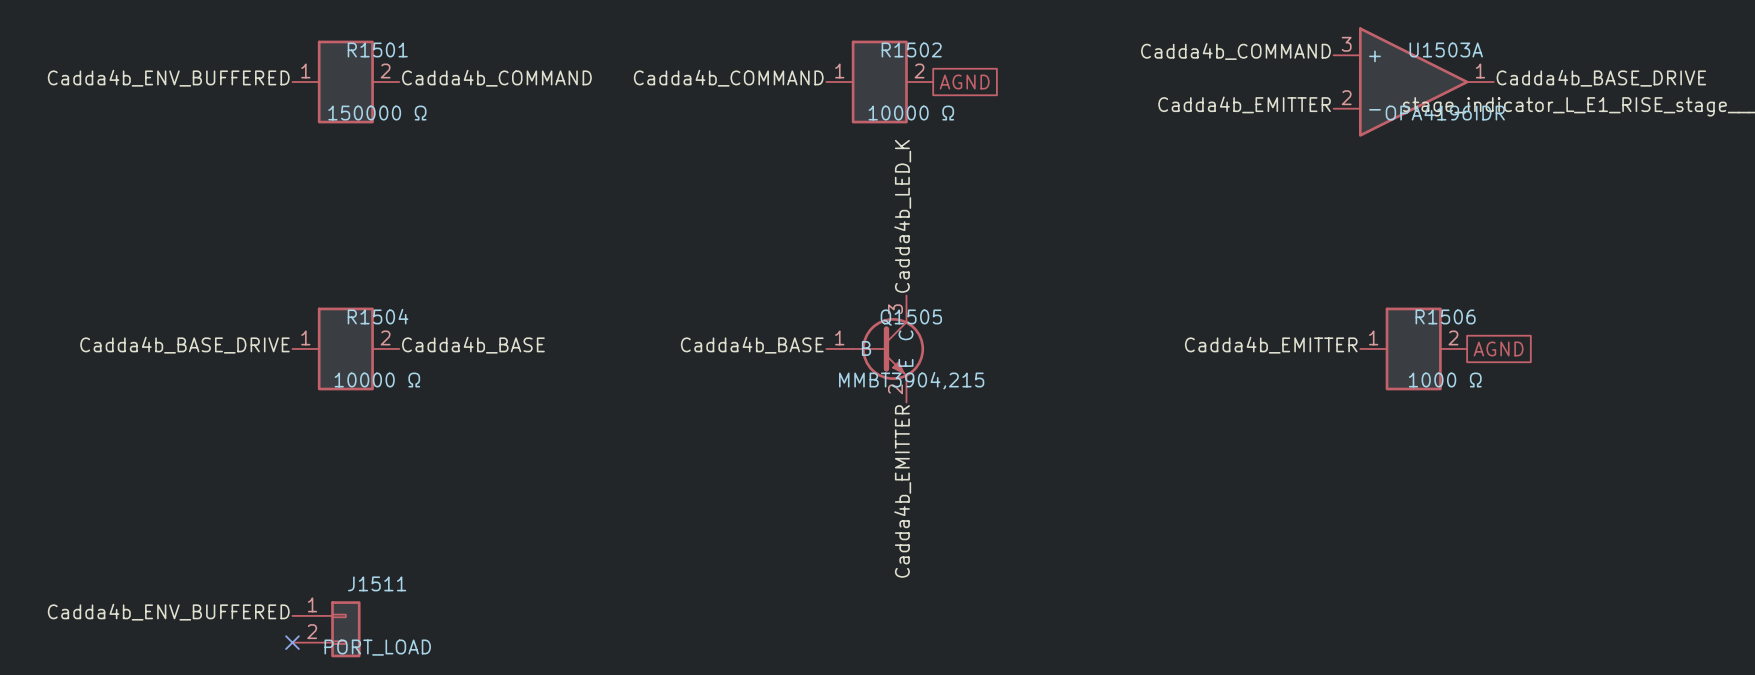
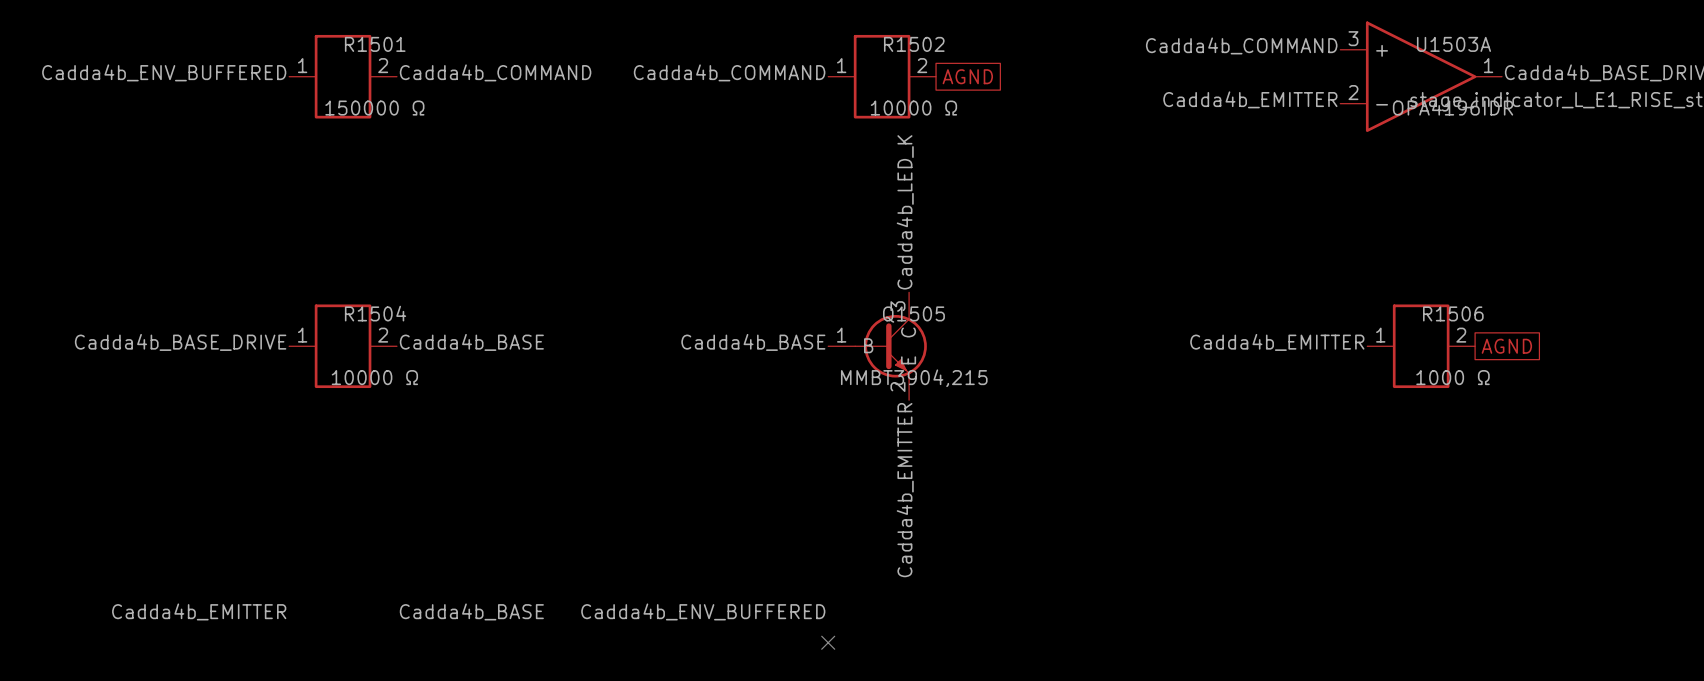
label: Cadda4b_ENV_BUFFERED (168, 612) -> Cadda4b_EMITTER (199, 611)
label: none -> Cadda4b_BASE (471, 611)
label: none -> Cadda4b_ENV_BUFFERED (703, 611)
J1511: PORT_LOAD (326, 629) -> none
no-connect mark: (292, 642) -> none
no-connect mark: none -> (828, 642)

